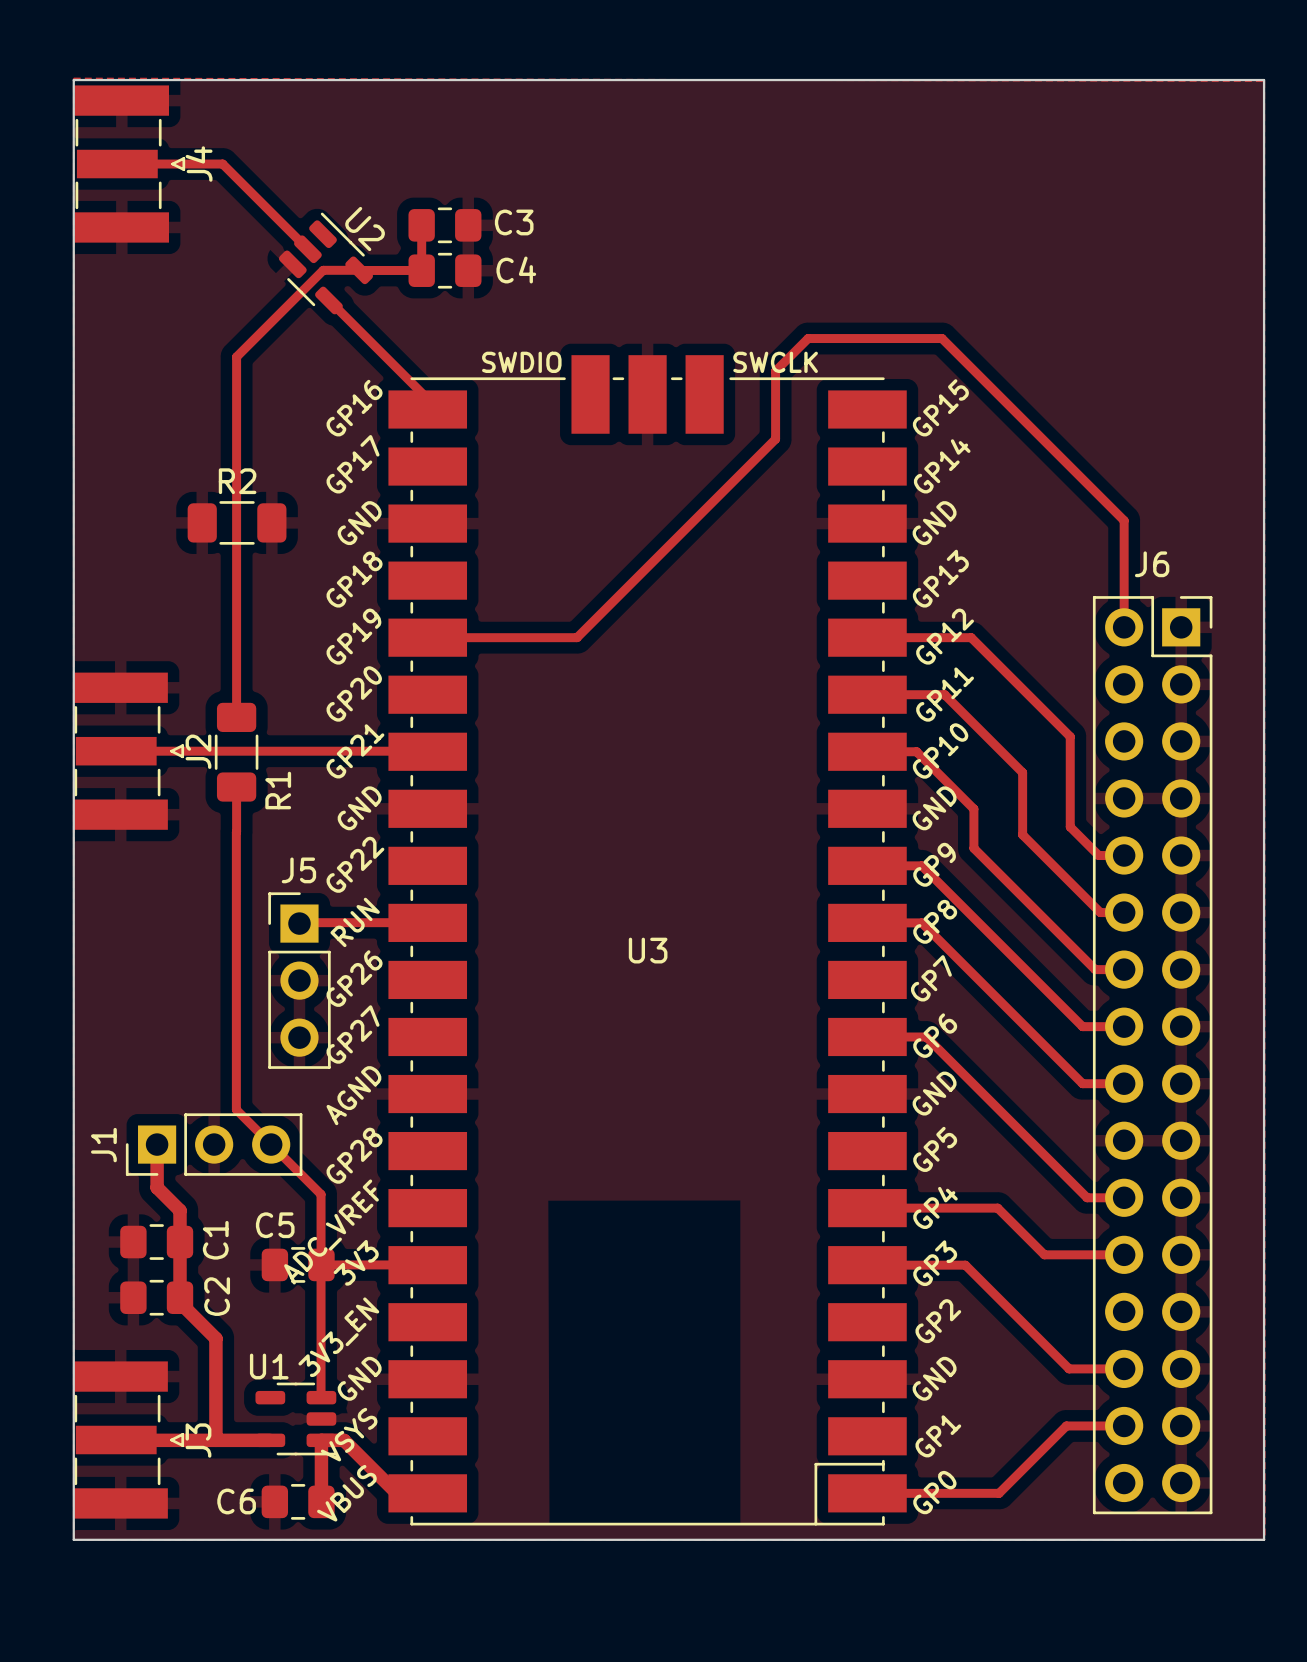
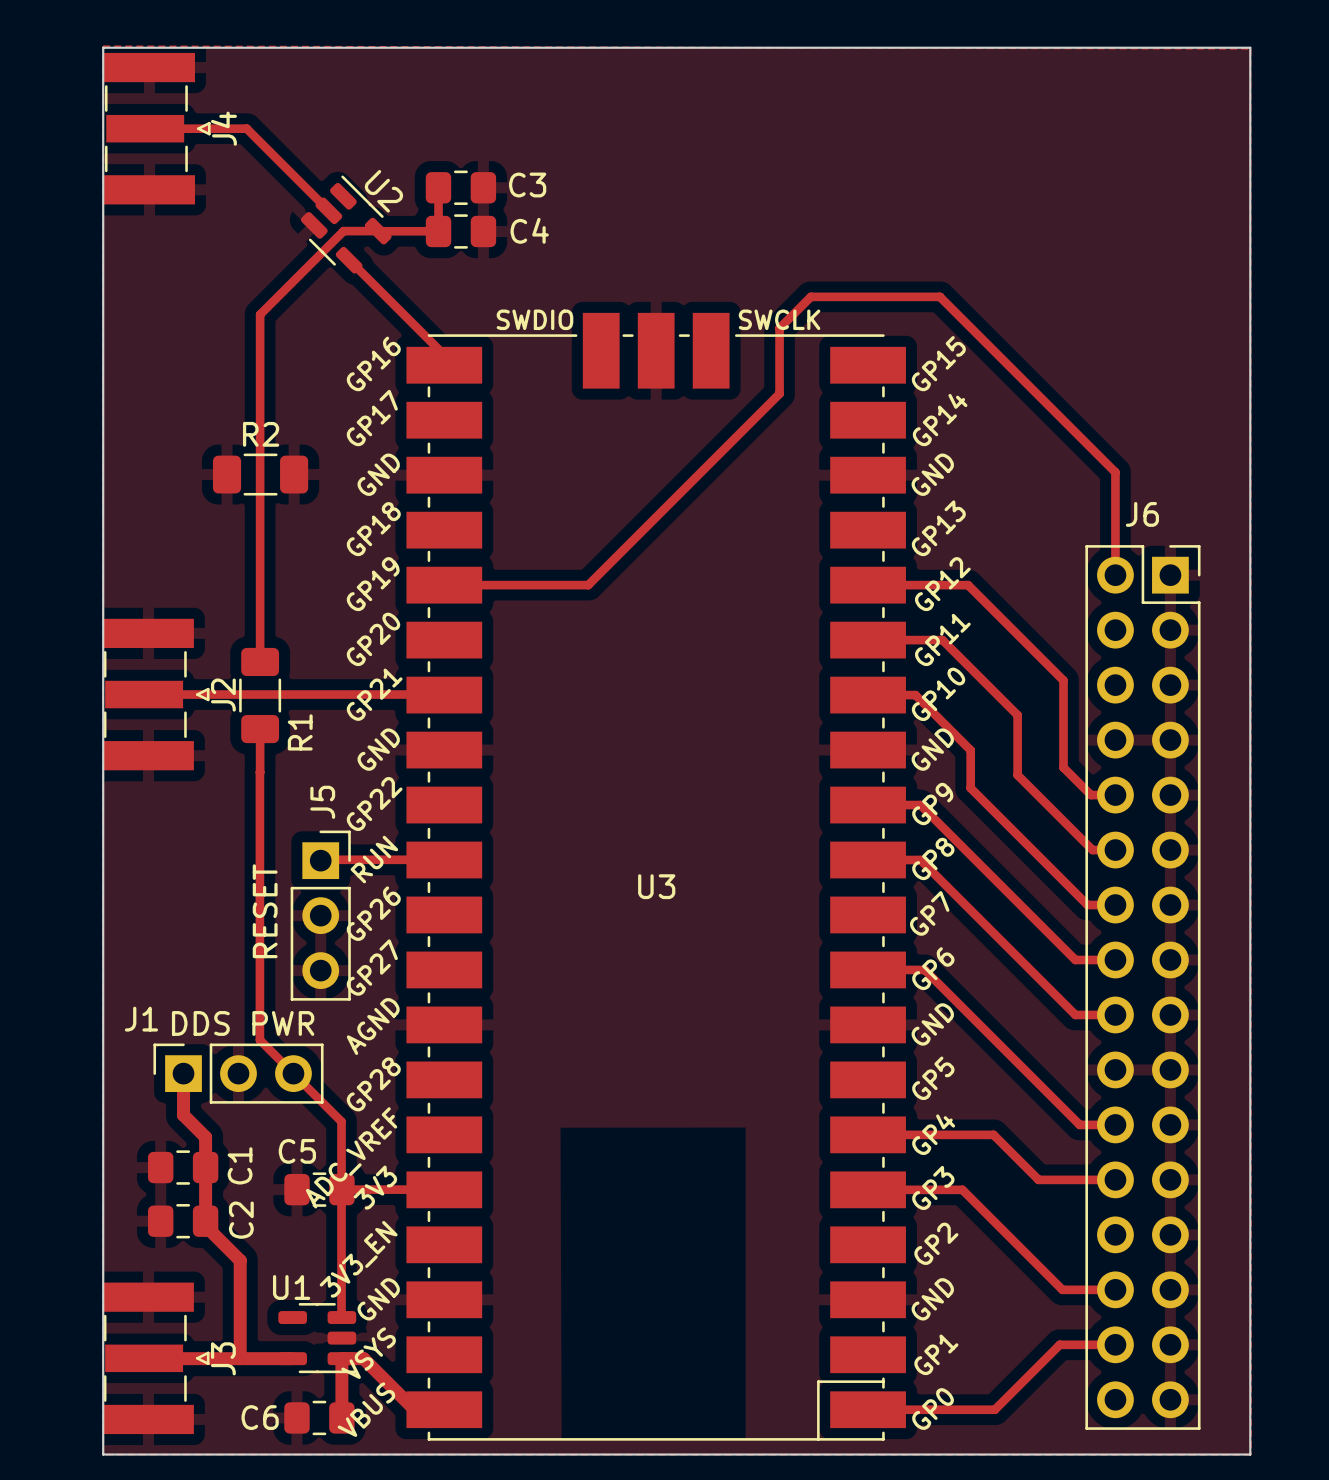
J5 footprint: [268, 892, 331, 1069] -> [290, 830, 351, 1001]
J5 value: none -> RESET (265, 911)
J1 value: none -> DDS PWR (243, 1023)
J1 footprint: [125, 1113, 303, 1176] -> [153, 1043, 324, 1104]
J1 name position: J1 (103, 1145) -> J1 (141, 1019)

